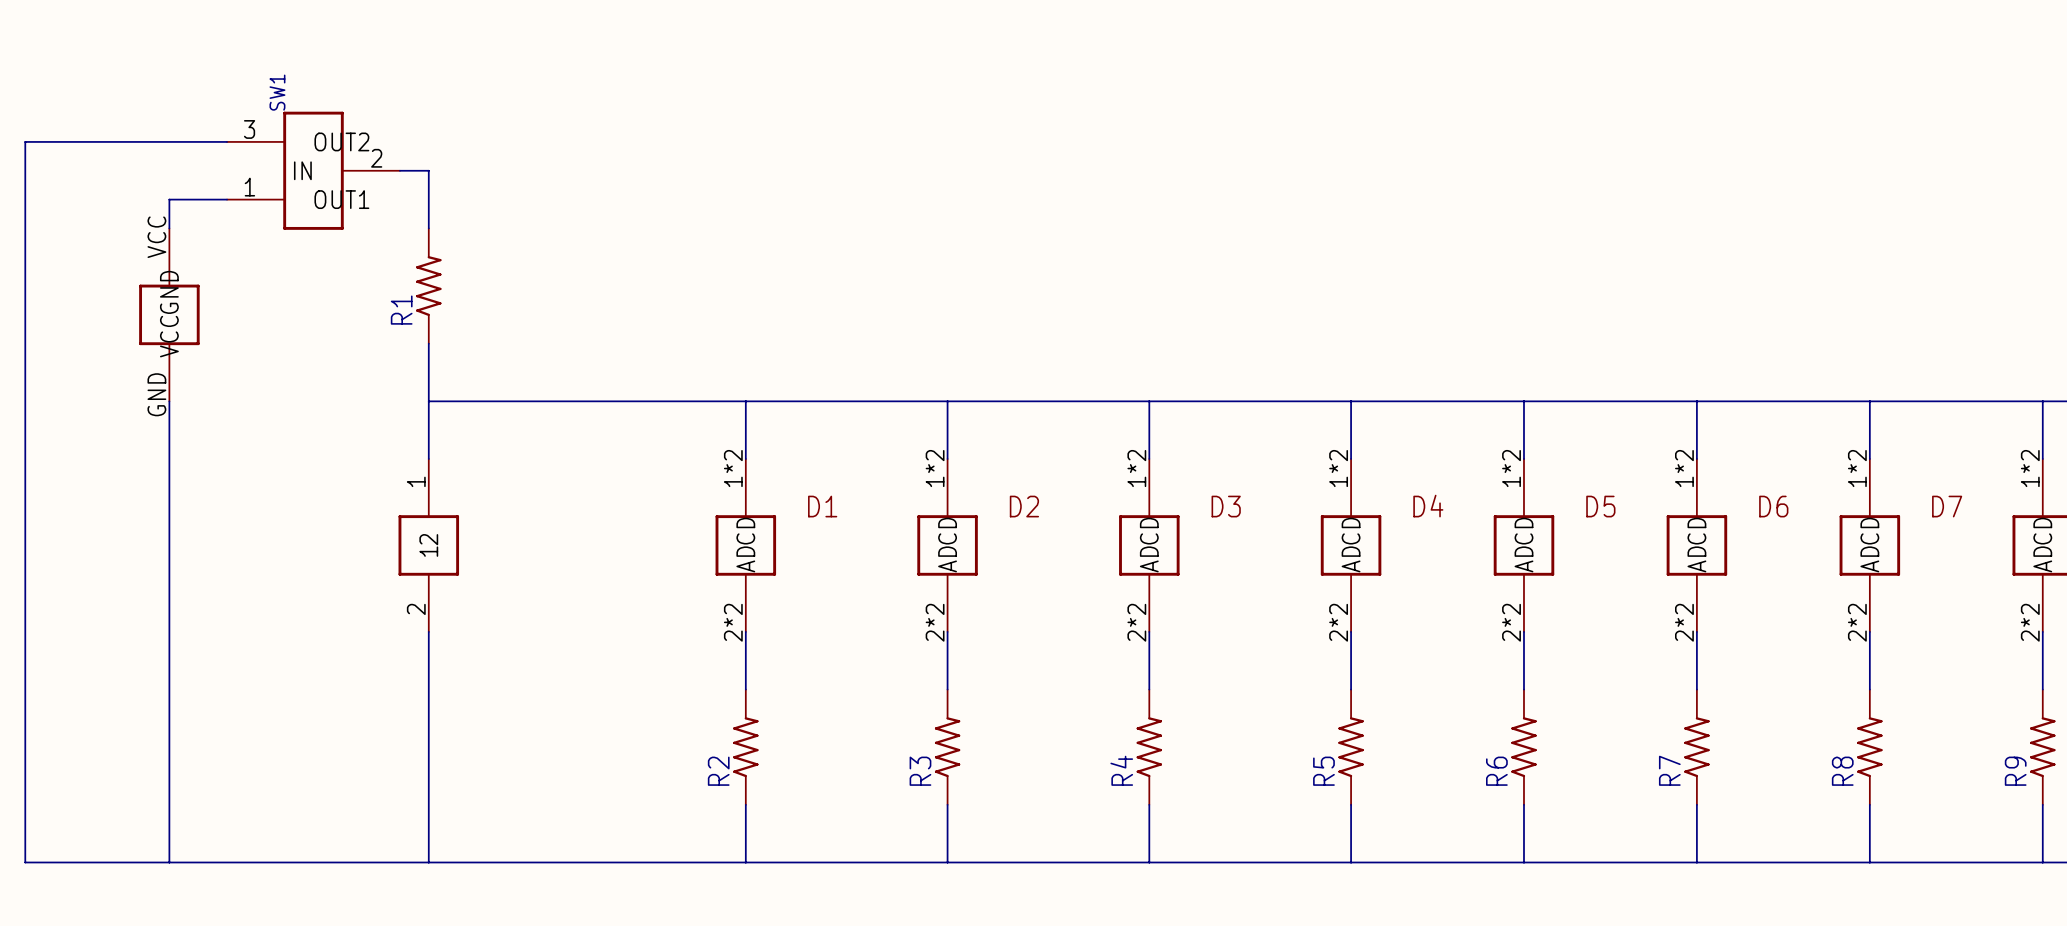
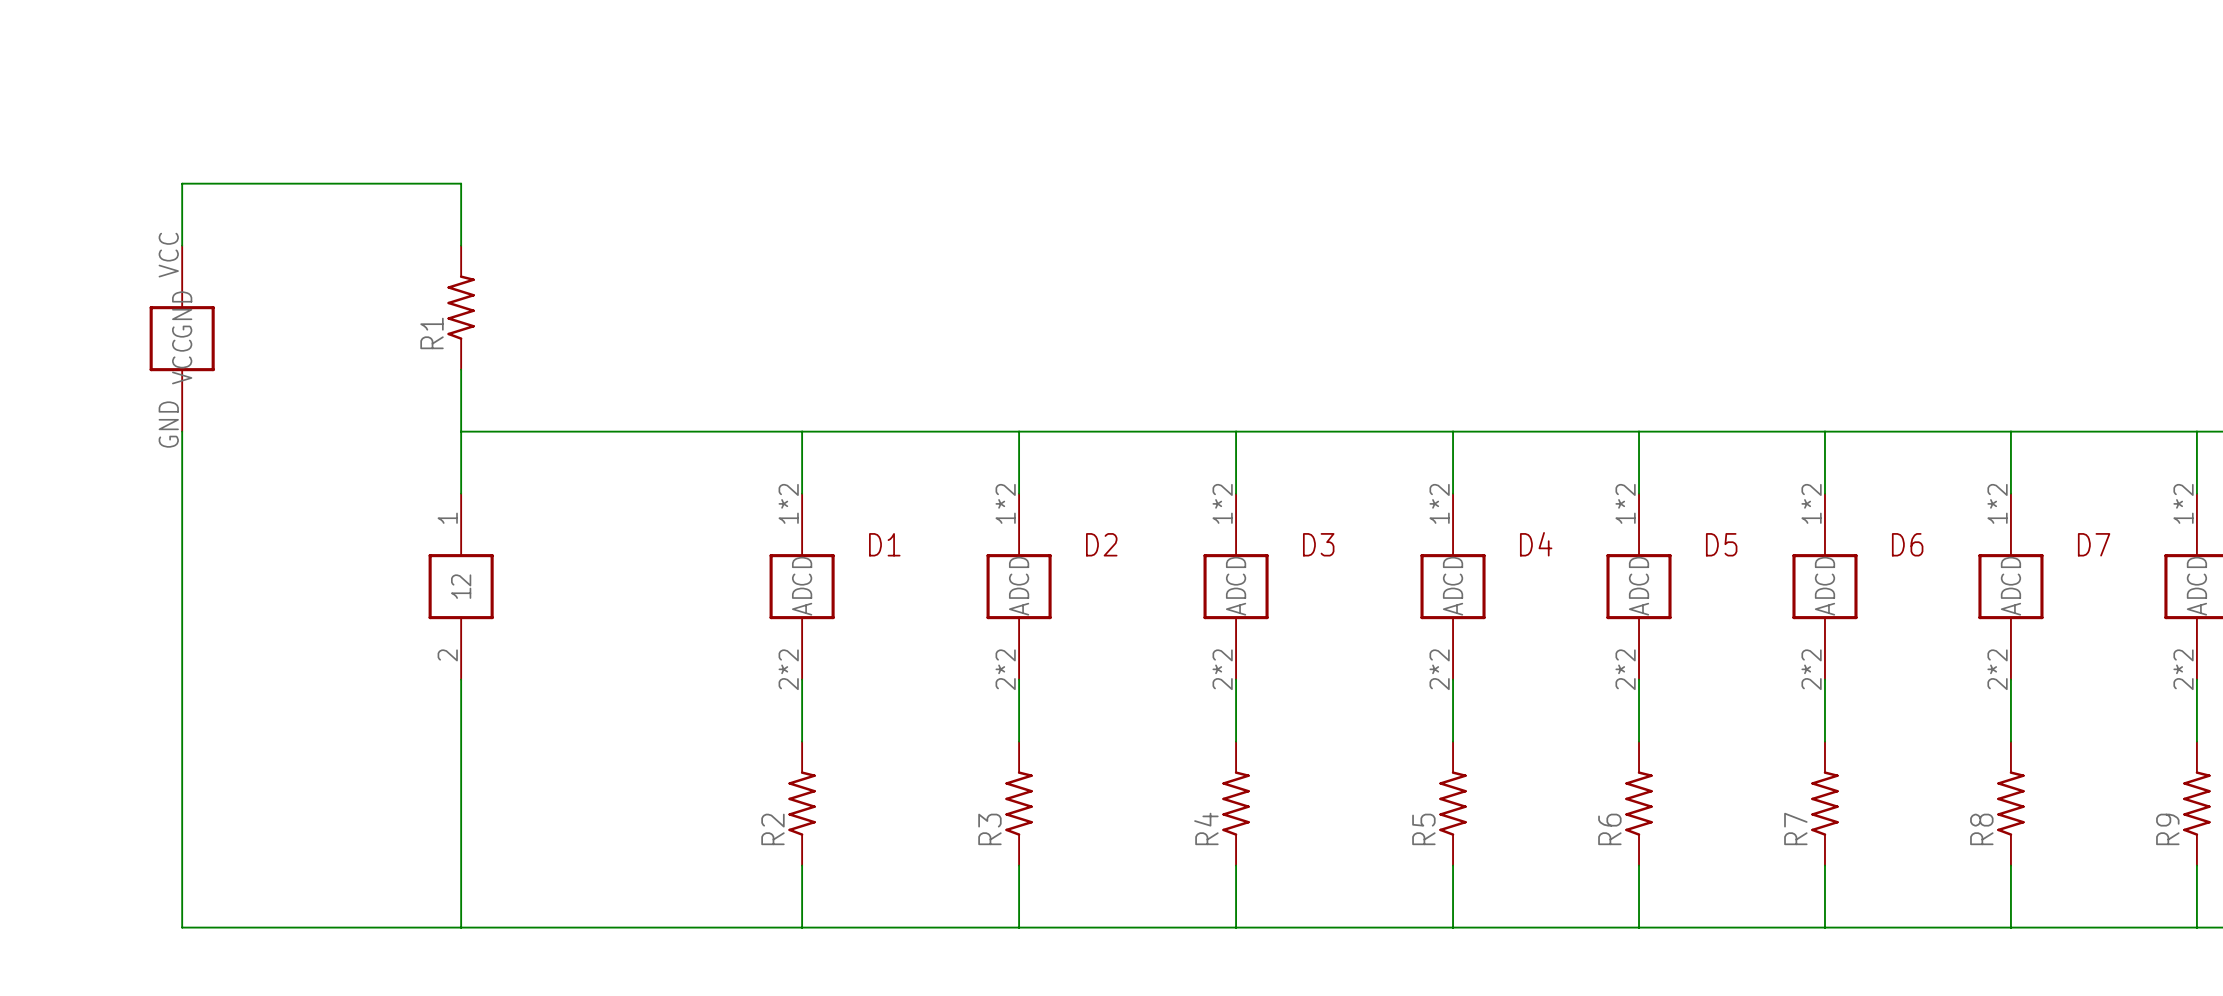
wire: (227, 141) (25, 141) (25, 862) (169, 862) -> none
SW1: (313, 170) -> none
wire: (169, 199) (227, 199) -> (182, 214) (182, 183) (430, 183)

